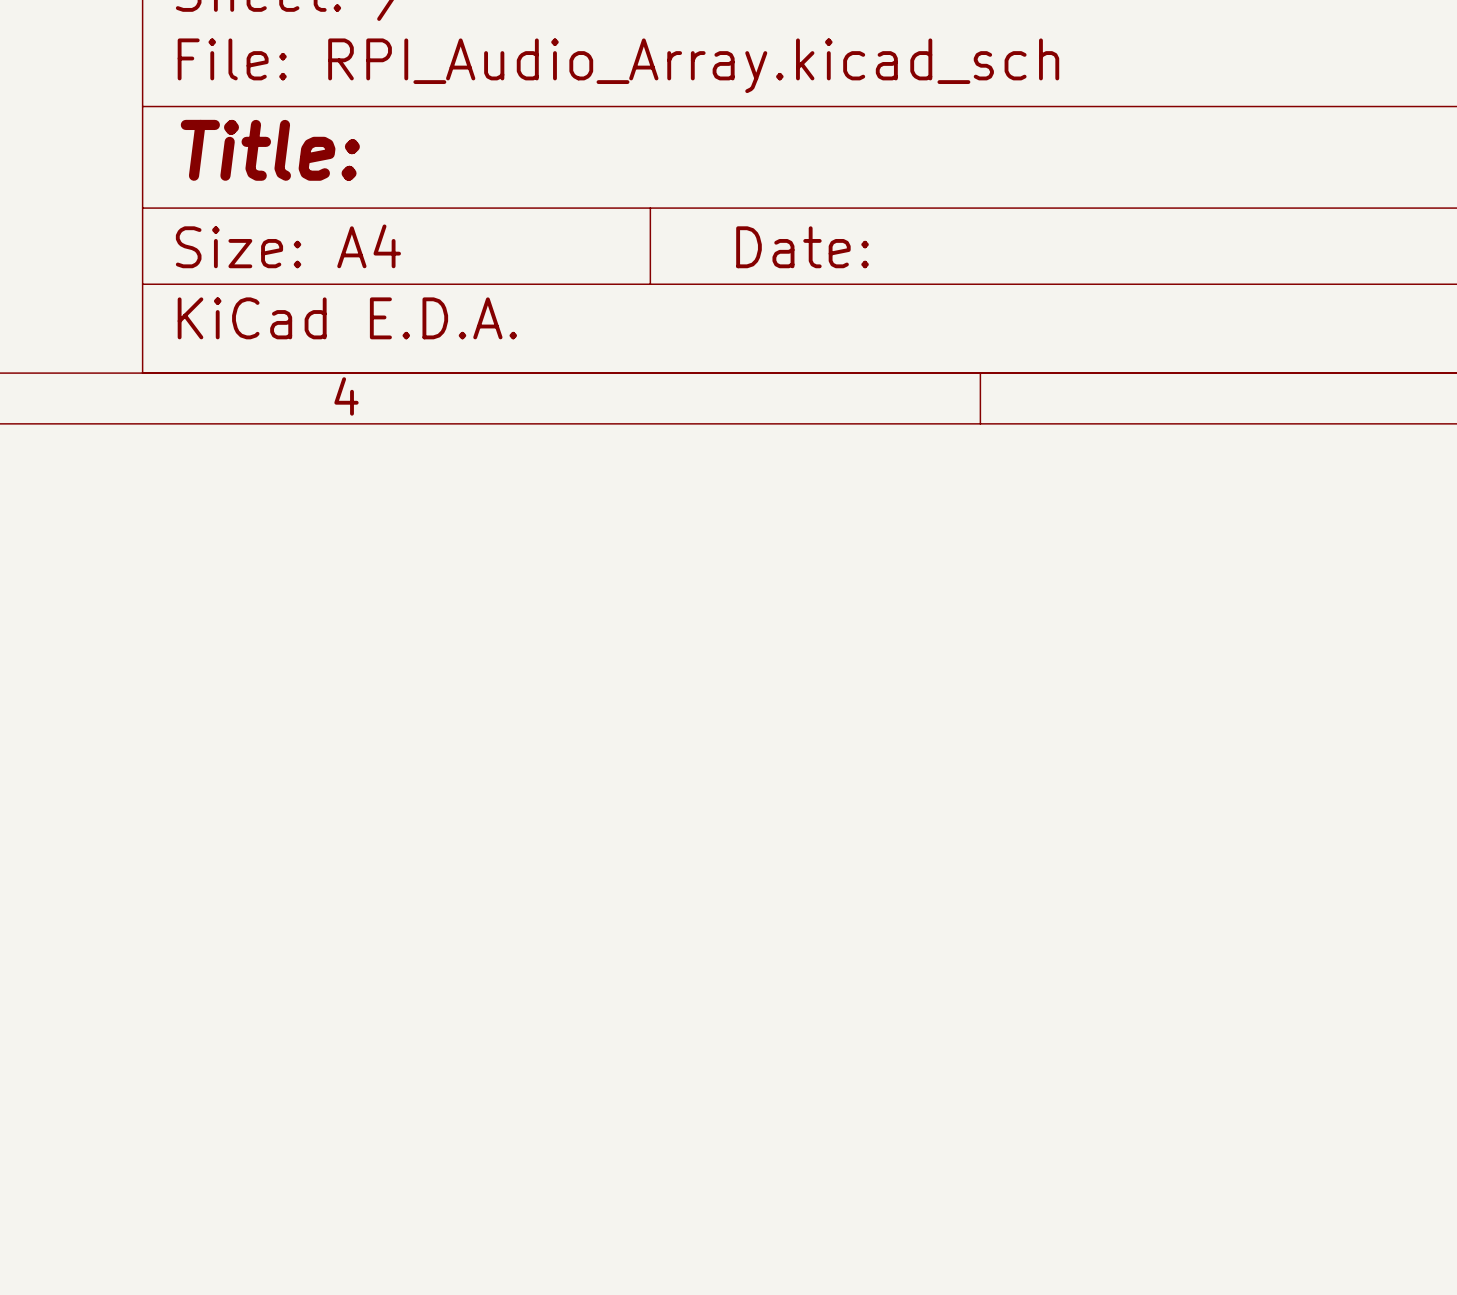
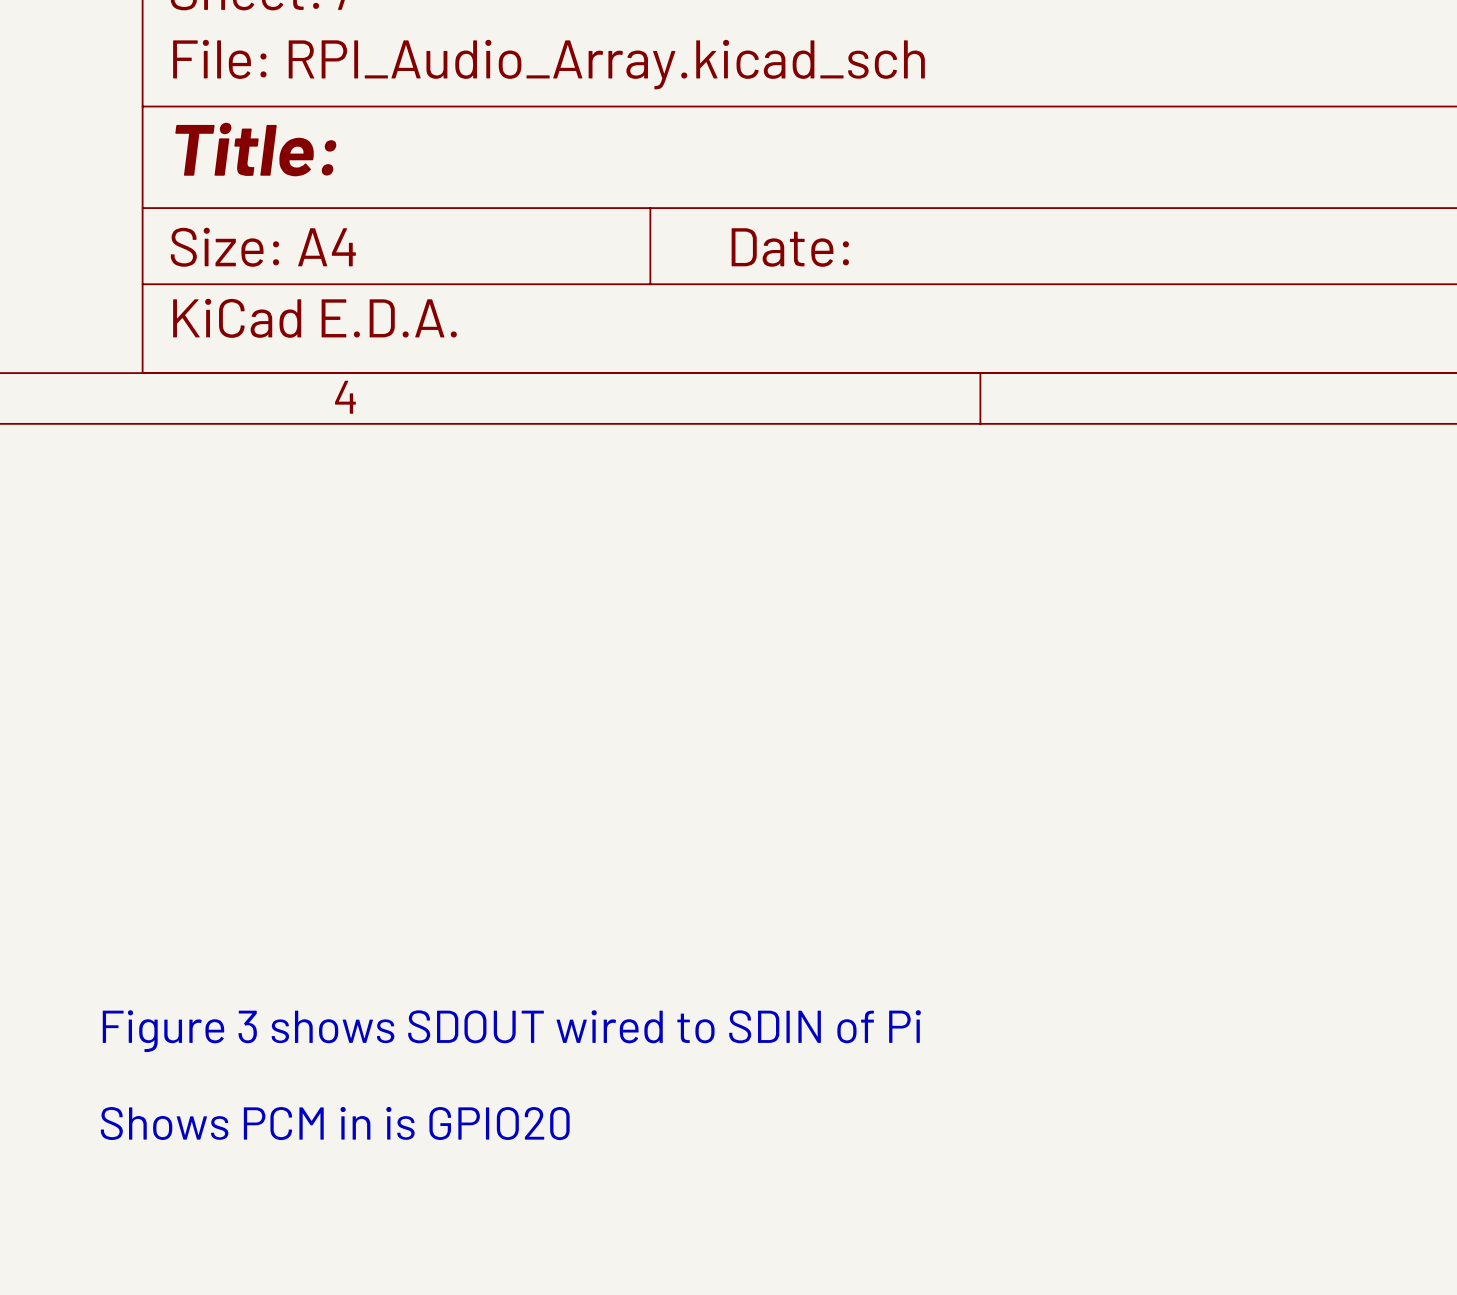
text: none -> Figure 3 shows SDOUT wired to SDIN of Pi (511, 1031)
text: none -> Shows PCM in is GPIO20 (335, 1123)

